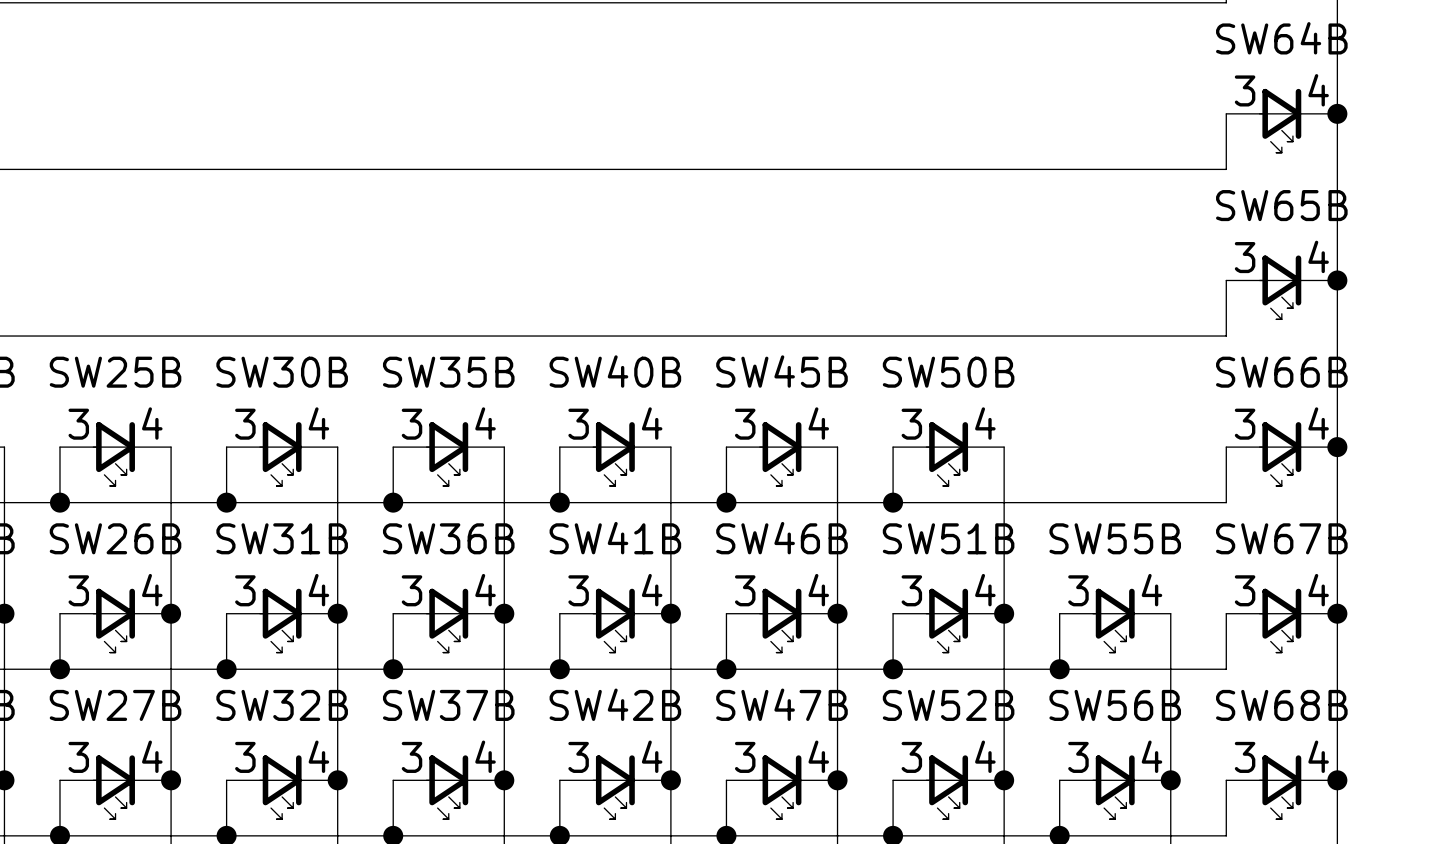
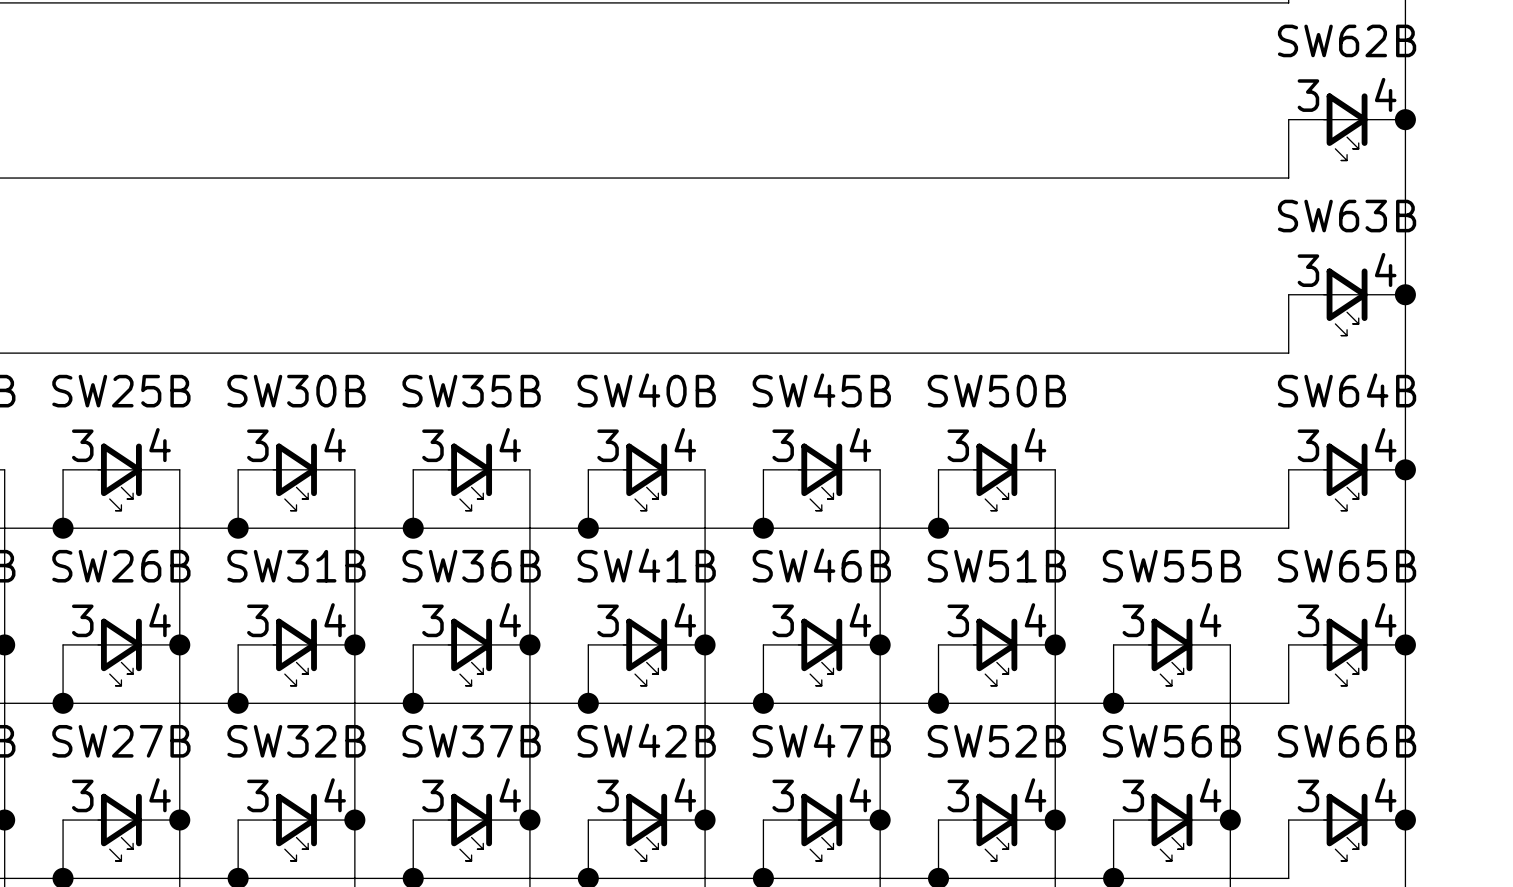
SW64B name: SW64B (1281, 38) -> SW62B (1347, 40)
SW65B name: SW65B (1281, 205) -> SW63B (1347, 216)
SW66B name: SW66B (1281, 372) -> SW64B (1347, 390)
SW67B name: SW67B (1281, 538) -> SW65B (1347, 566)
SW68B name: SW68B (1281, 705) -> SW66B (1347, 741)

